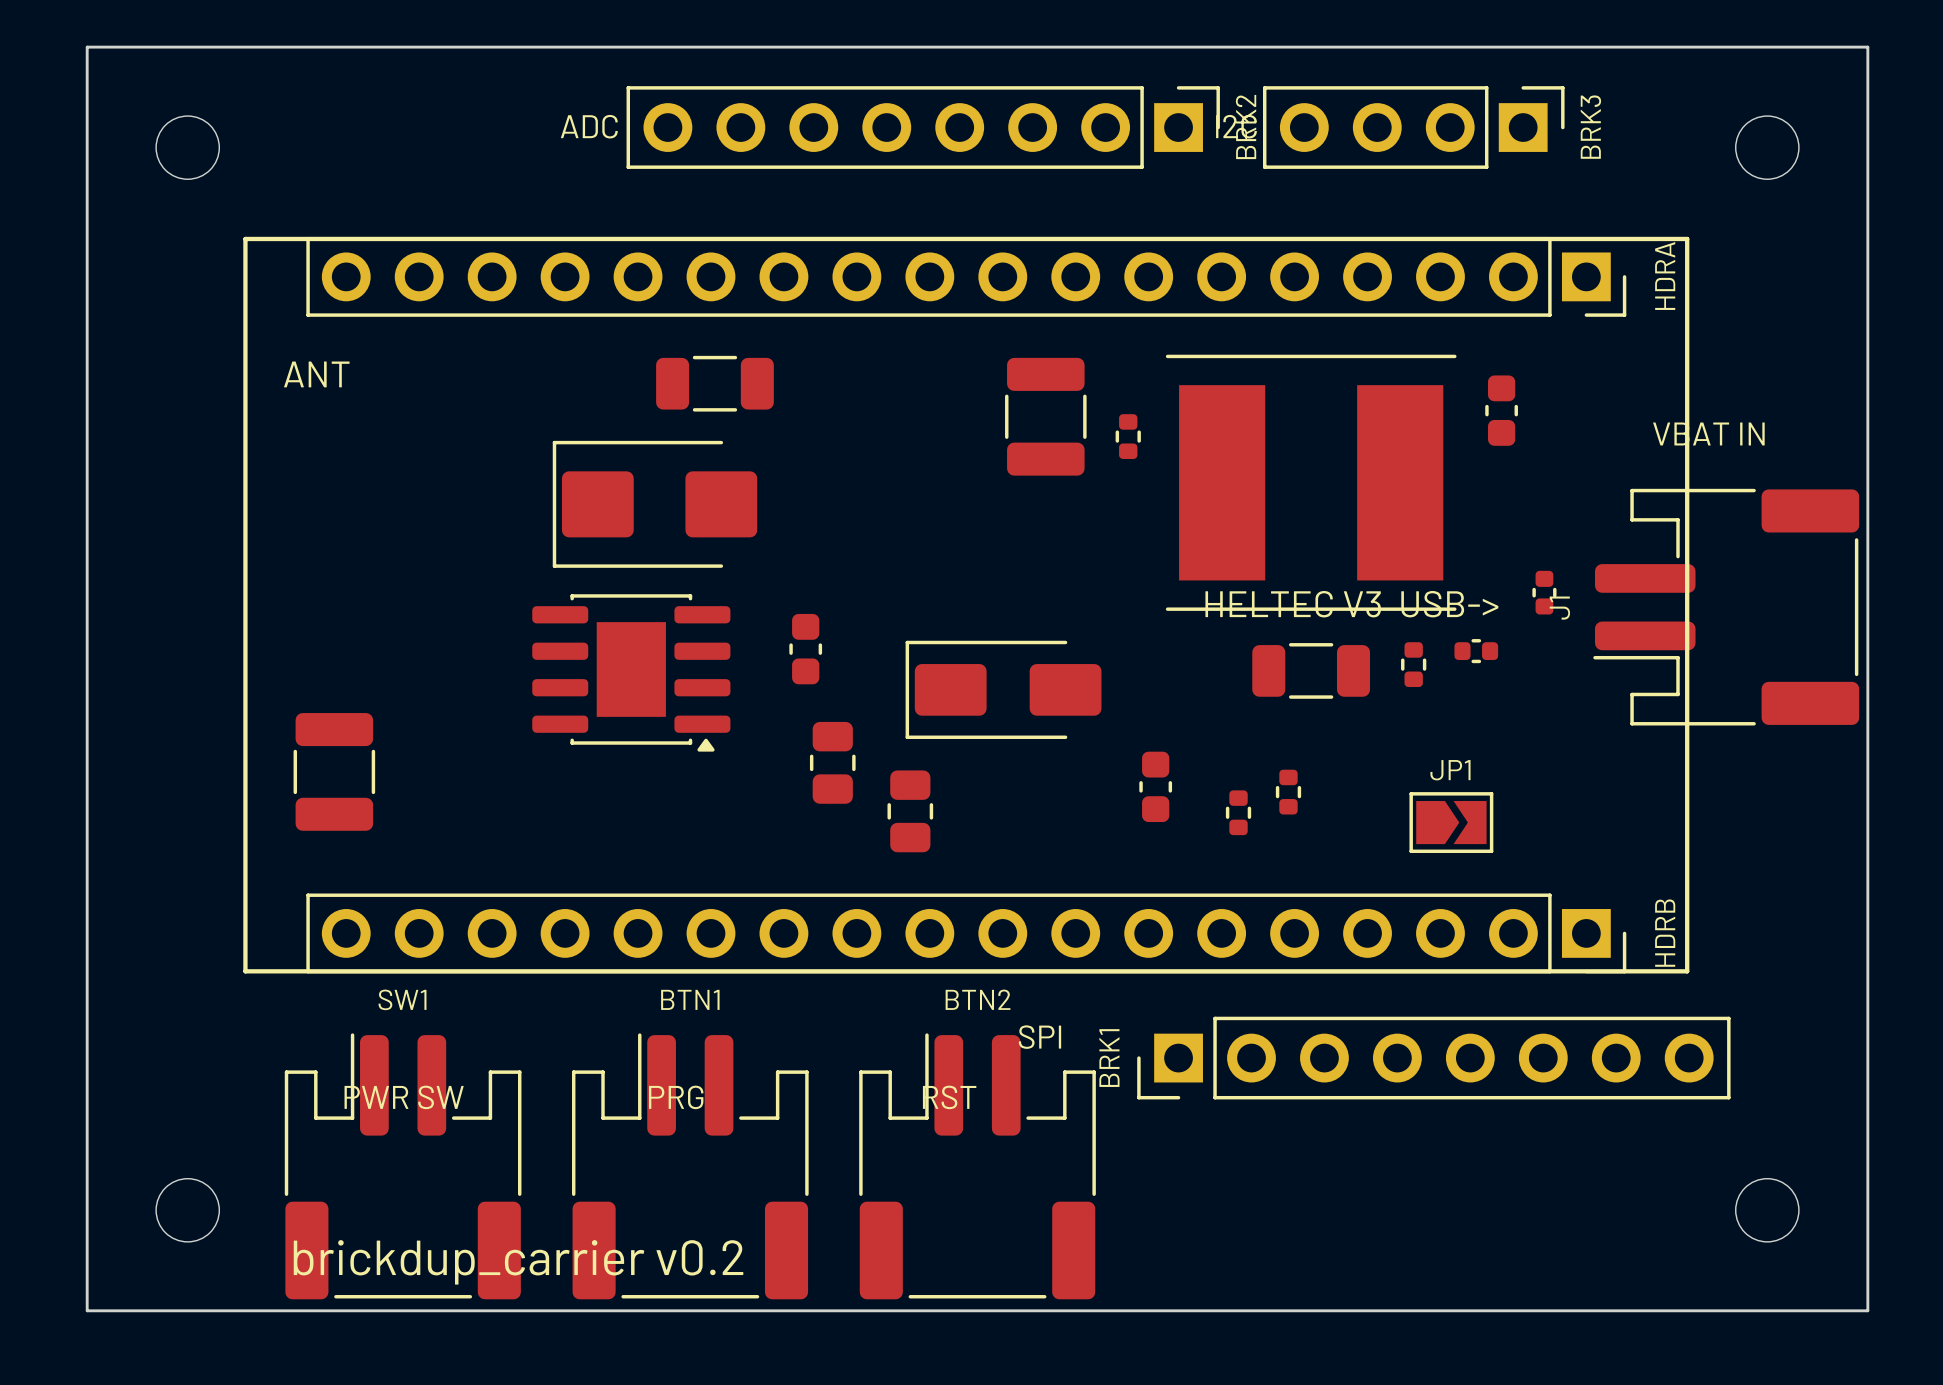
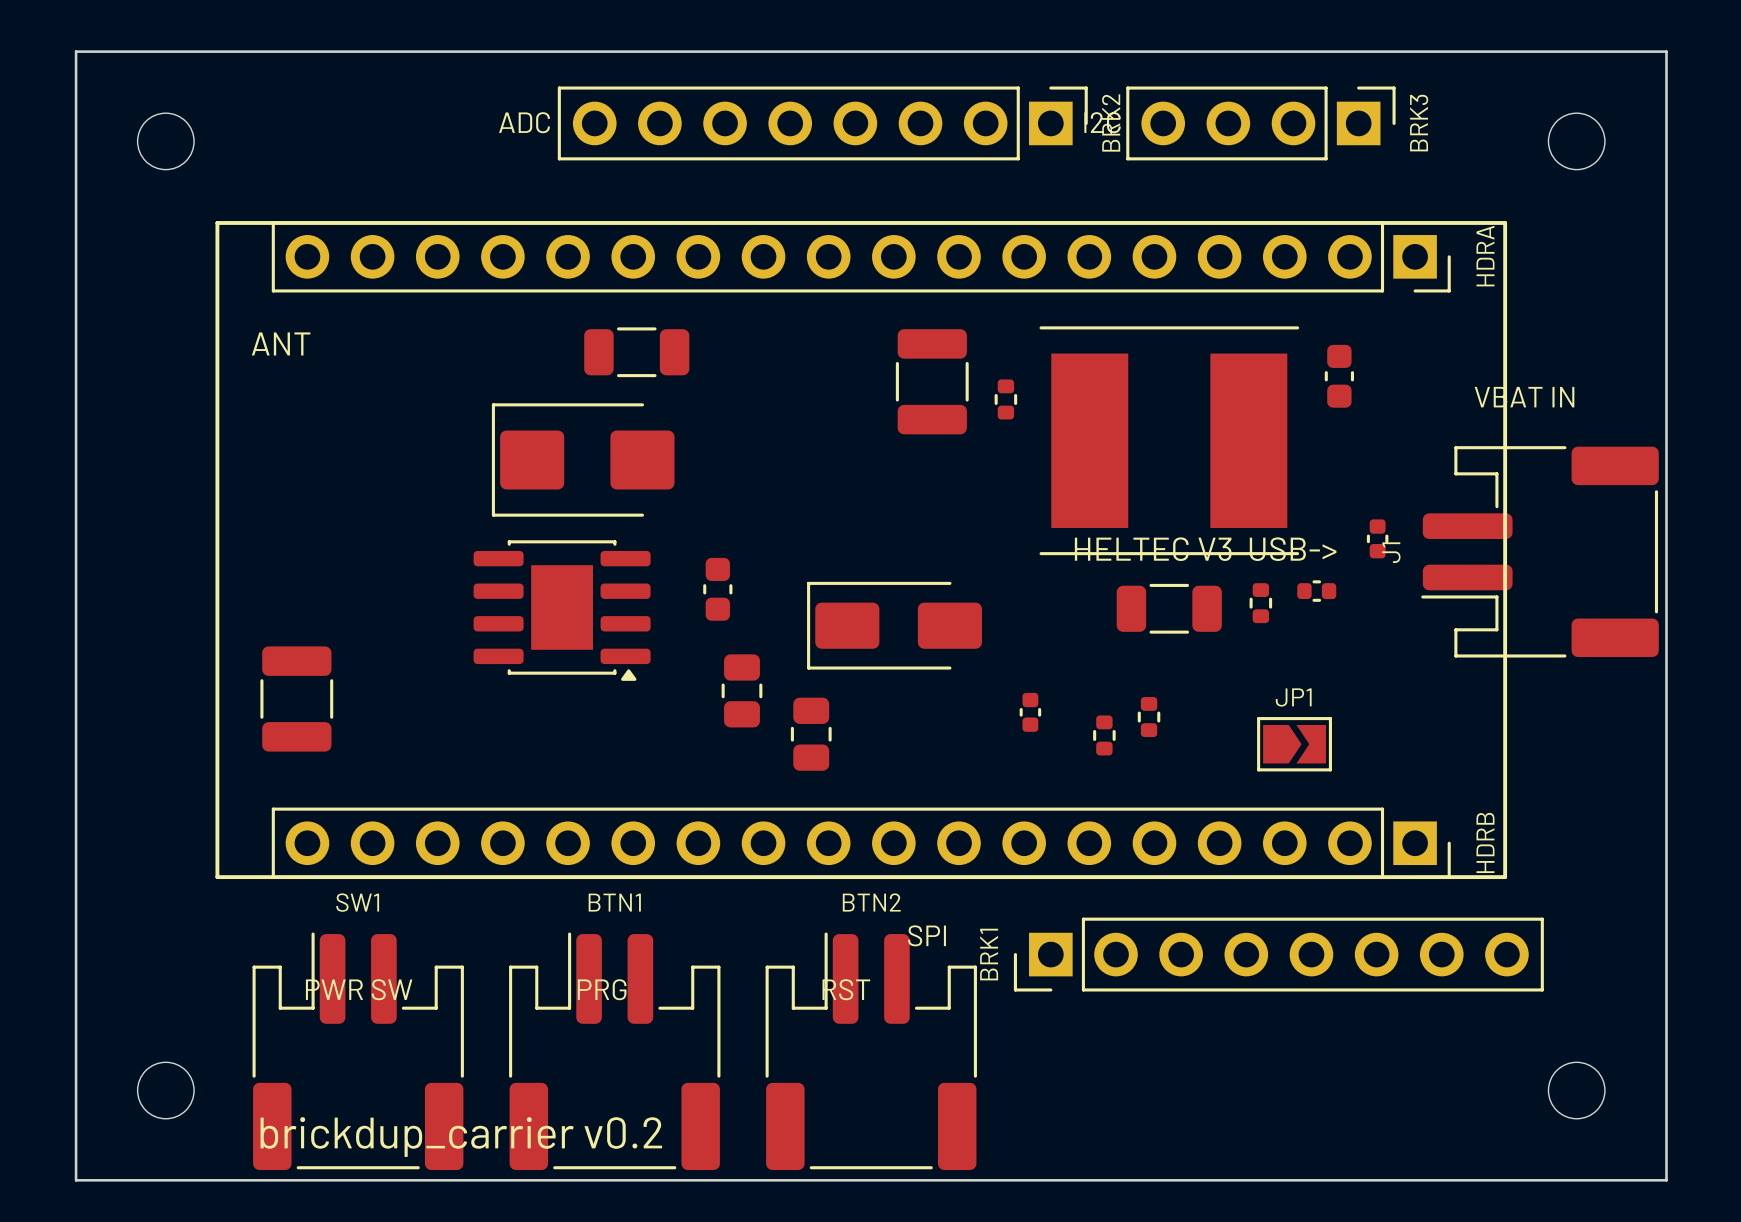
part footprint: [1139, 751, 1173, 823] -> [1019, 692, 1042, 732]

